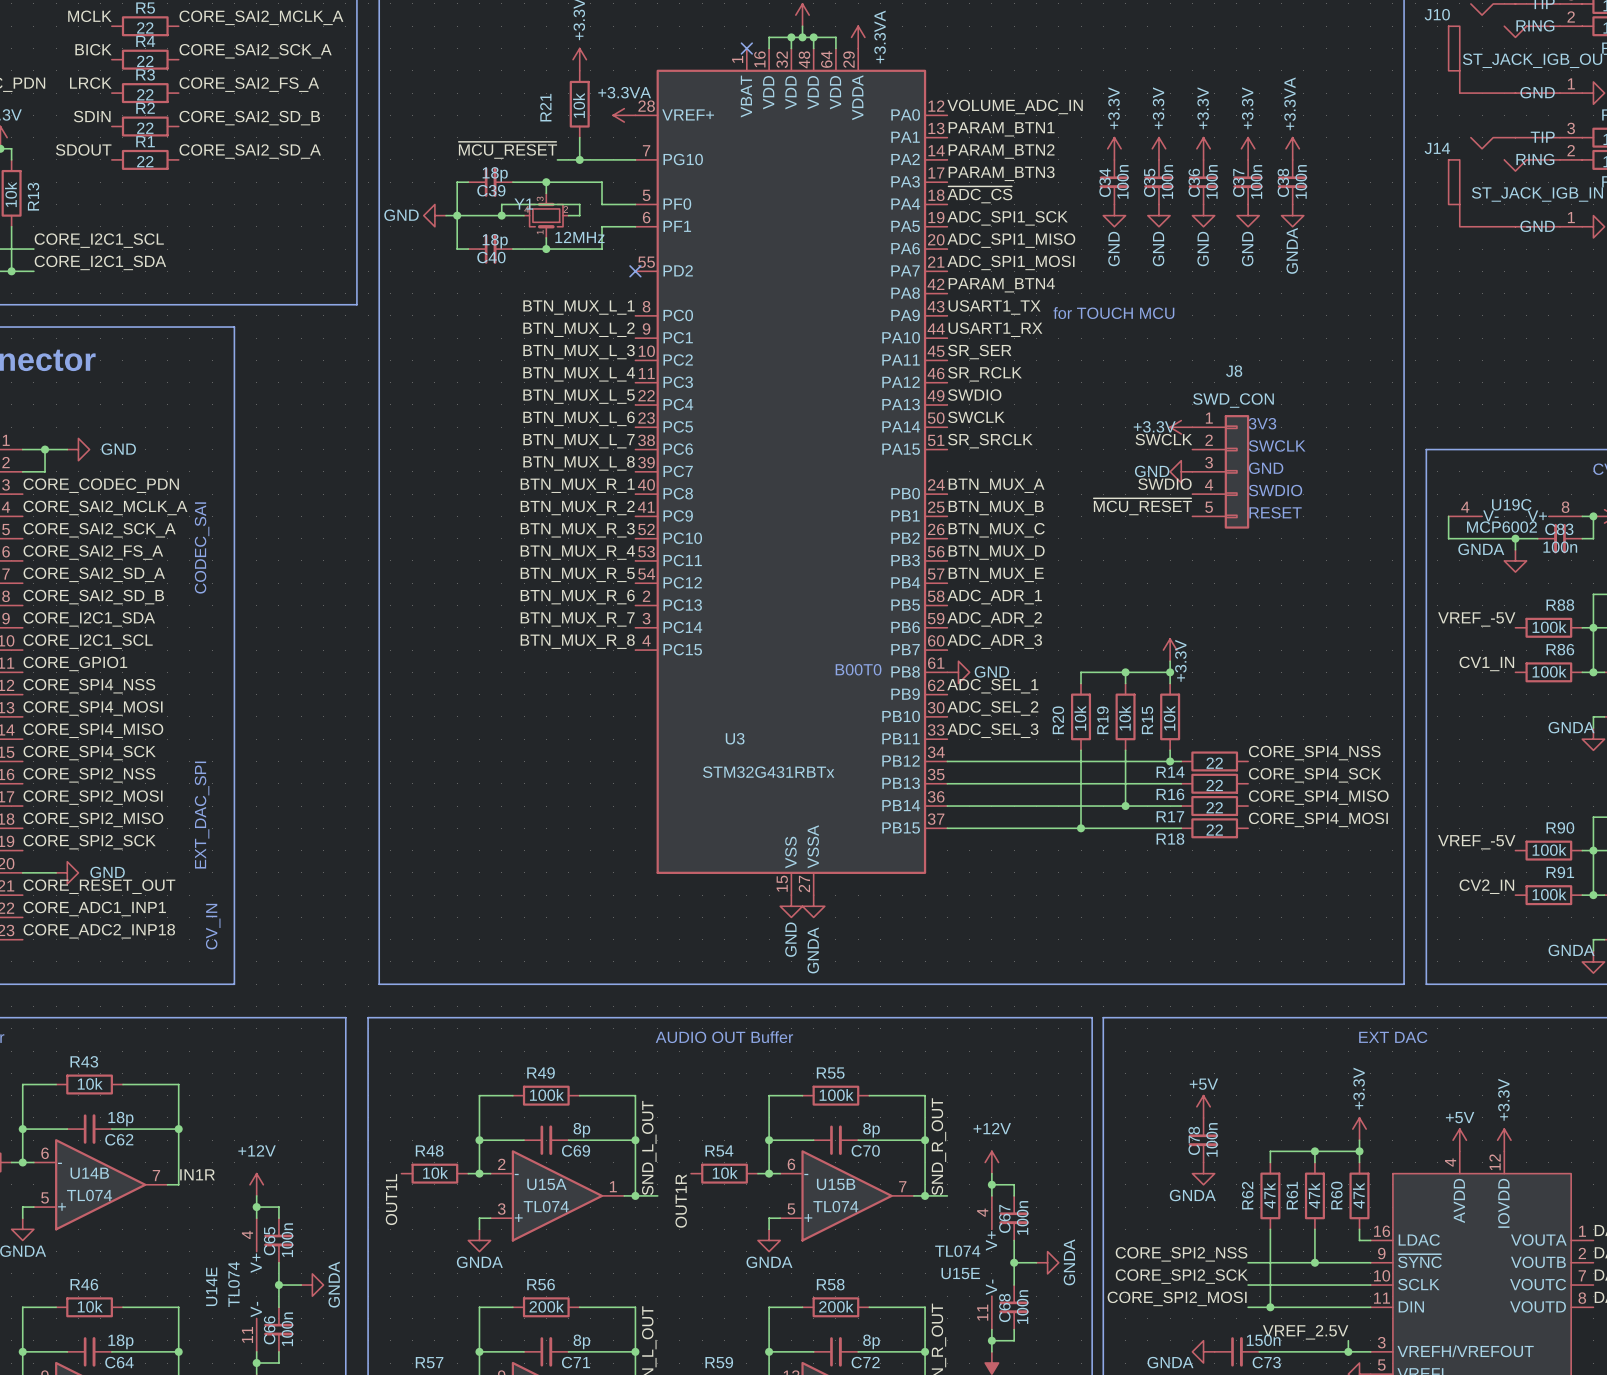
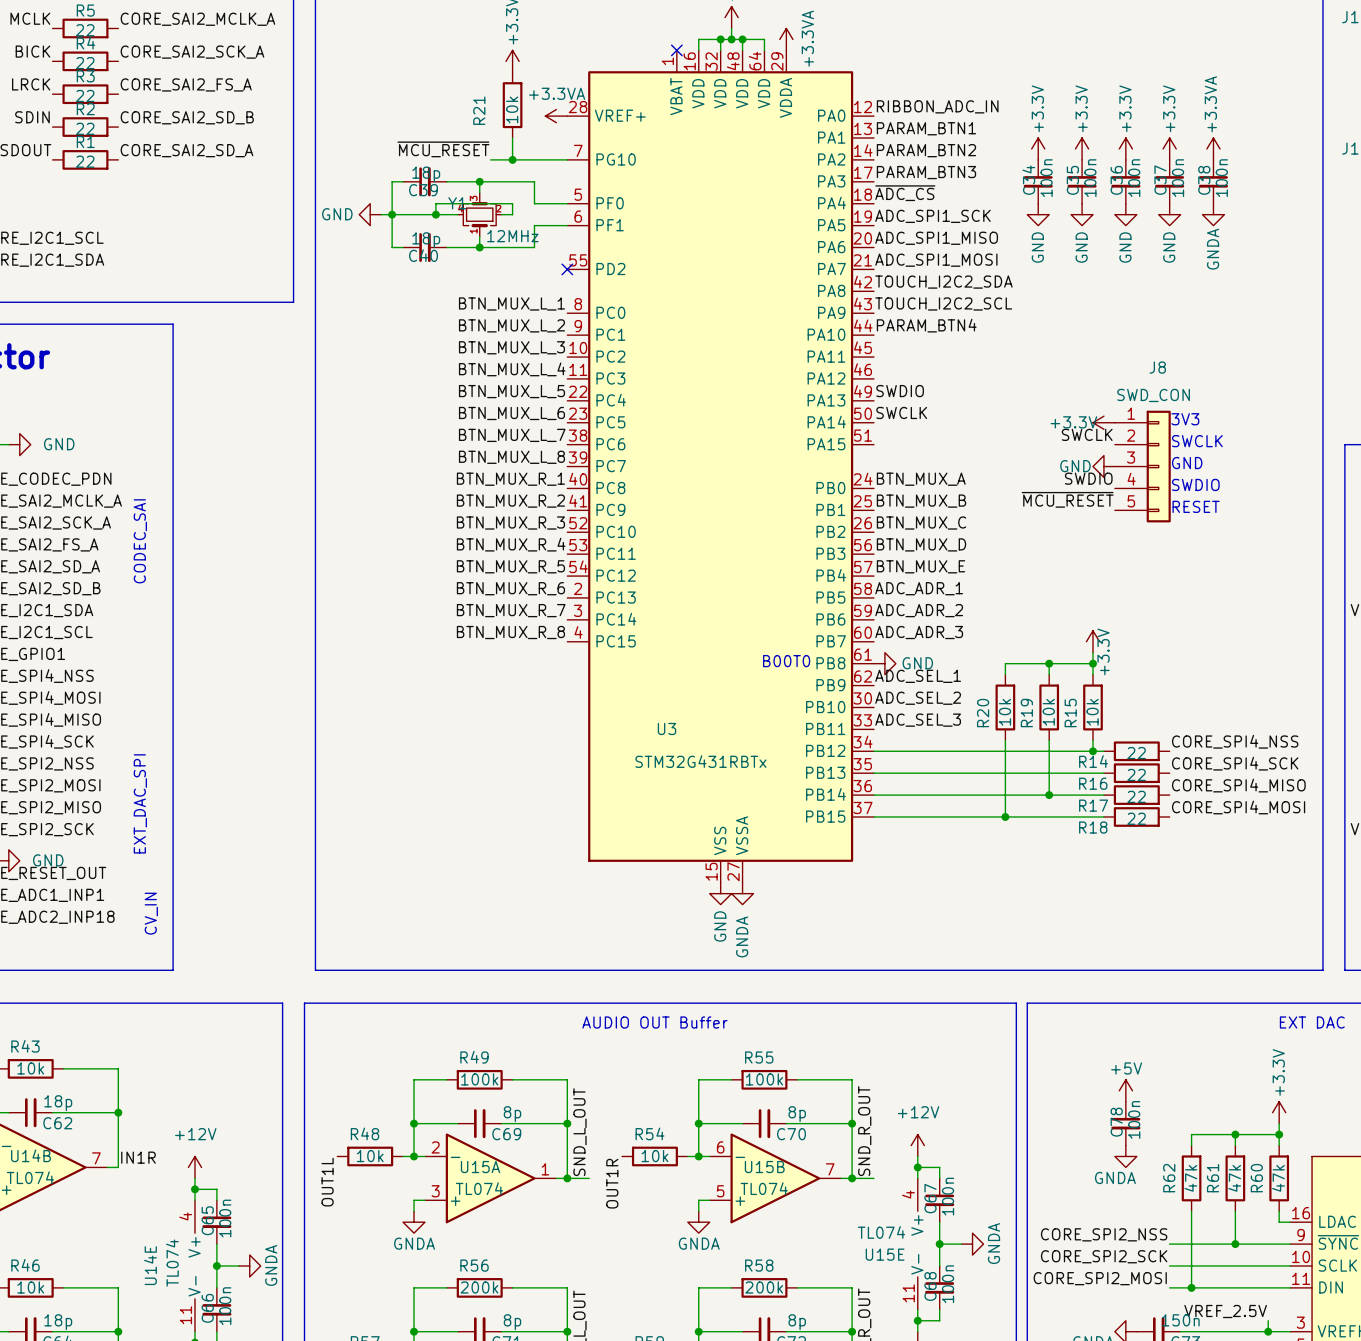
label: VOLUME_ADC_IN (1015, 106) -> RIBBON_ADC_IN (937, 106)
label: PARAM_BTN4 (1001, 285) -> TOUCH_I2C2_SDA (943, 282)
label: USART1_TX (994, 307) -> TOUCH_I2C2_SCL (943, 303)
text: for TOUCH MCU (1113, 313) -> none
label: USART1_RX (995, 329) -> PARAM_BTN4 (926, 325)
label: SR_SER (979, 352) -> none
label: SR_RCLK (984, 374) -> none
label: SR_SRCLK (990, 441) -> none

